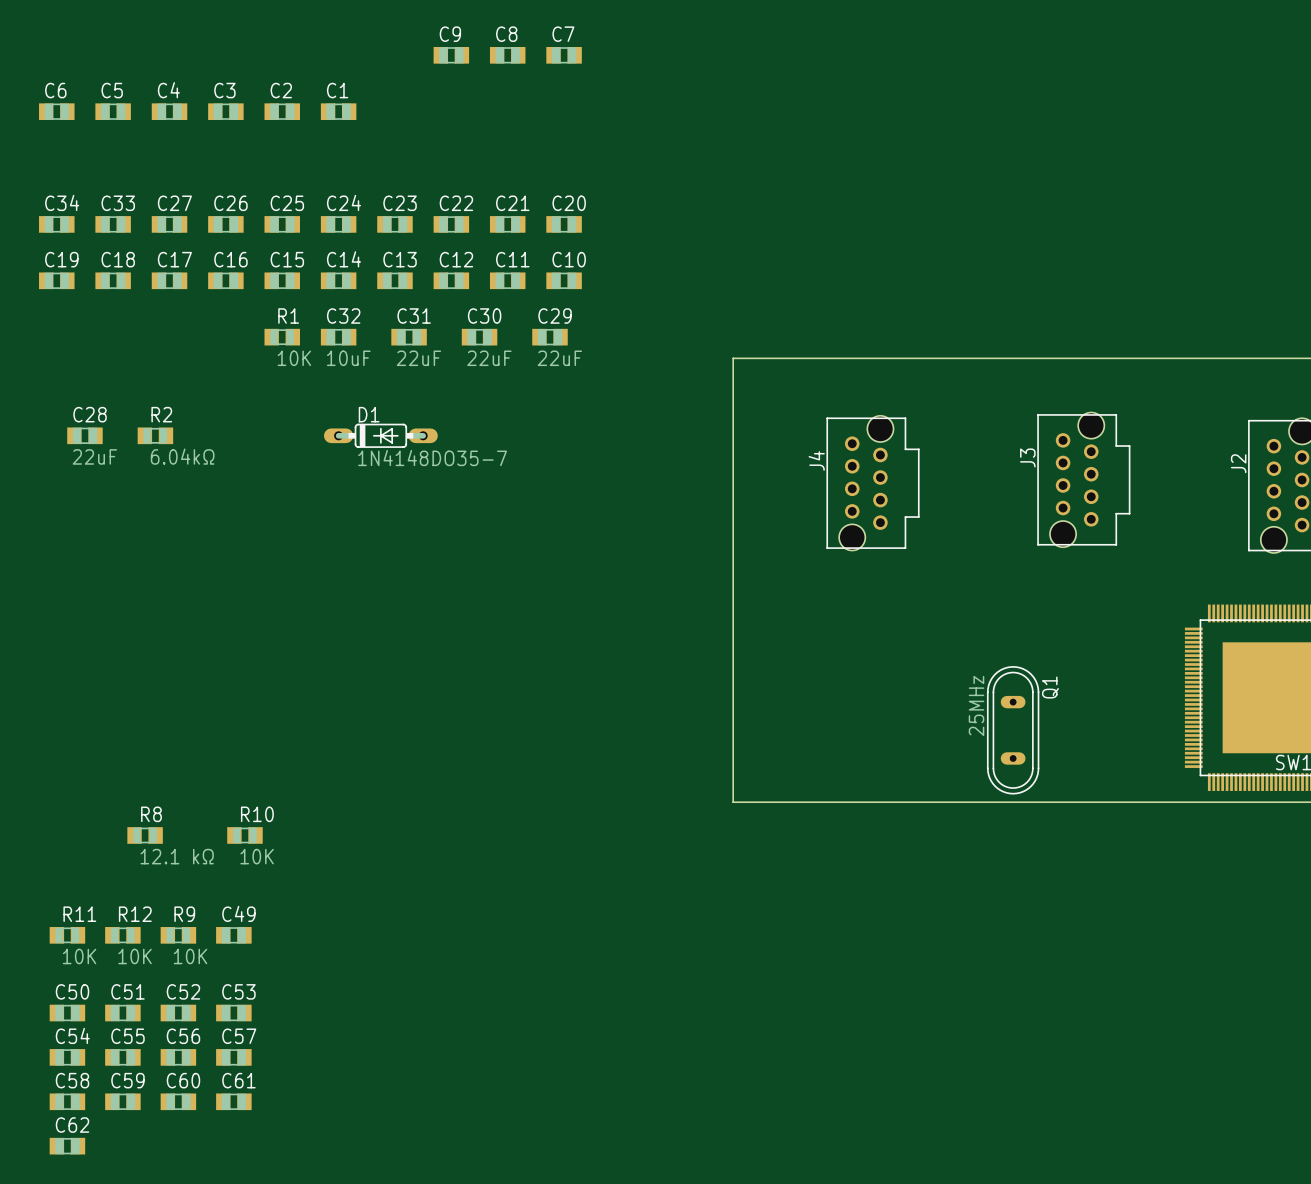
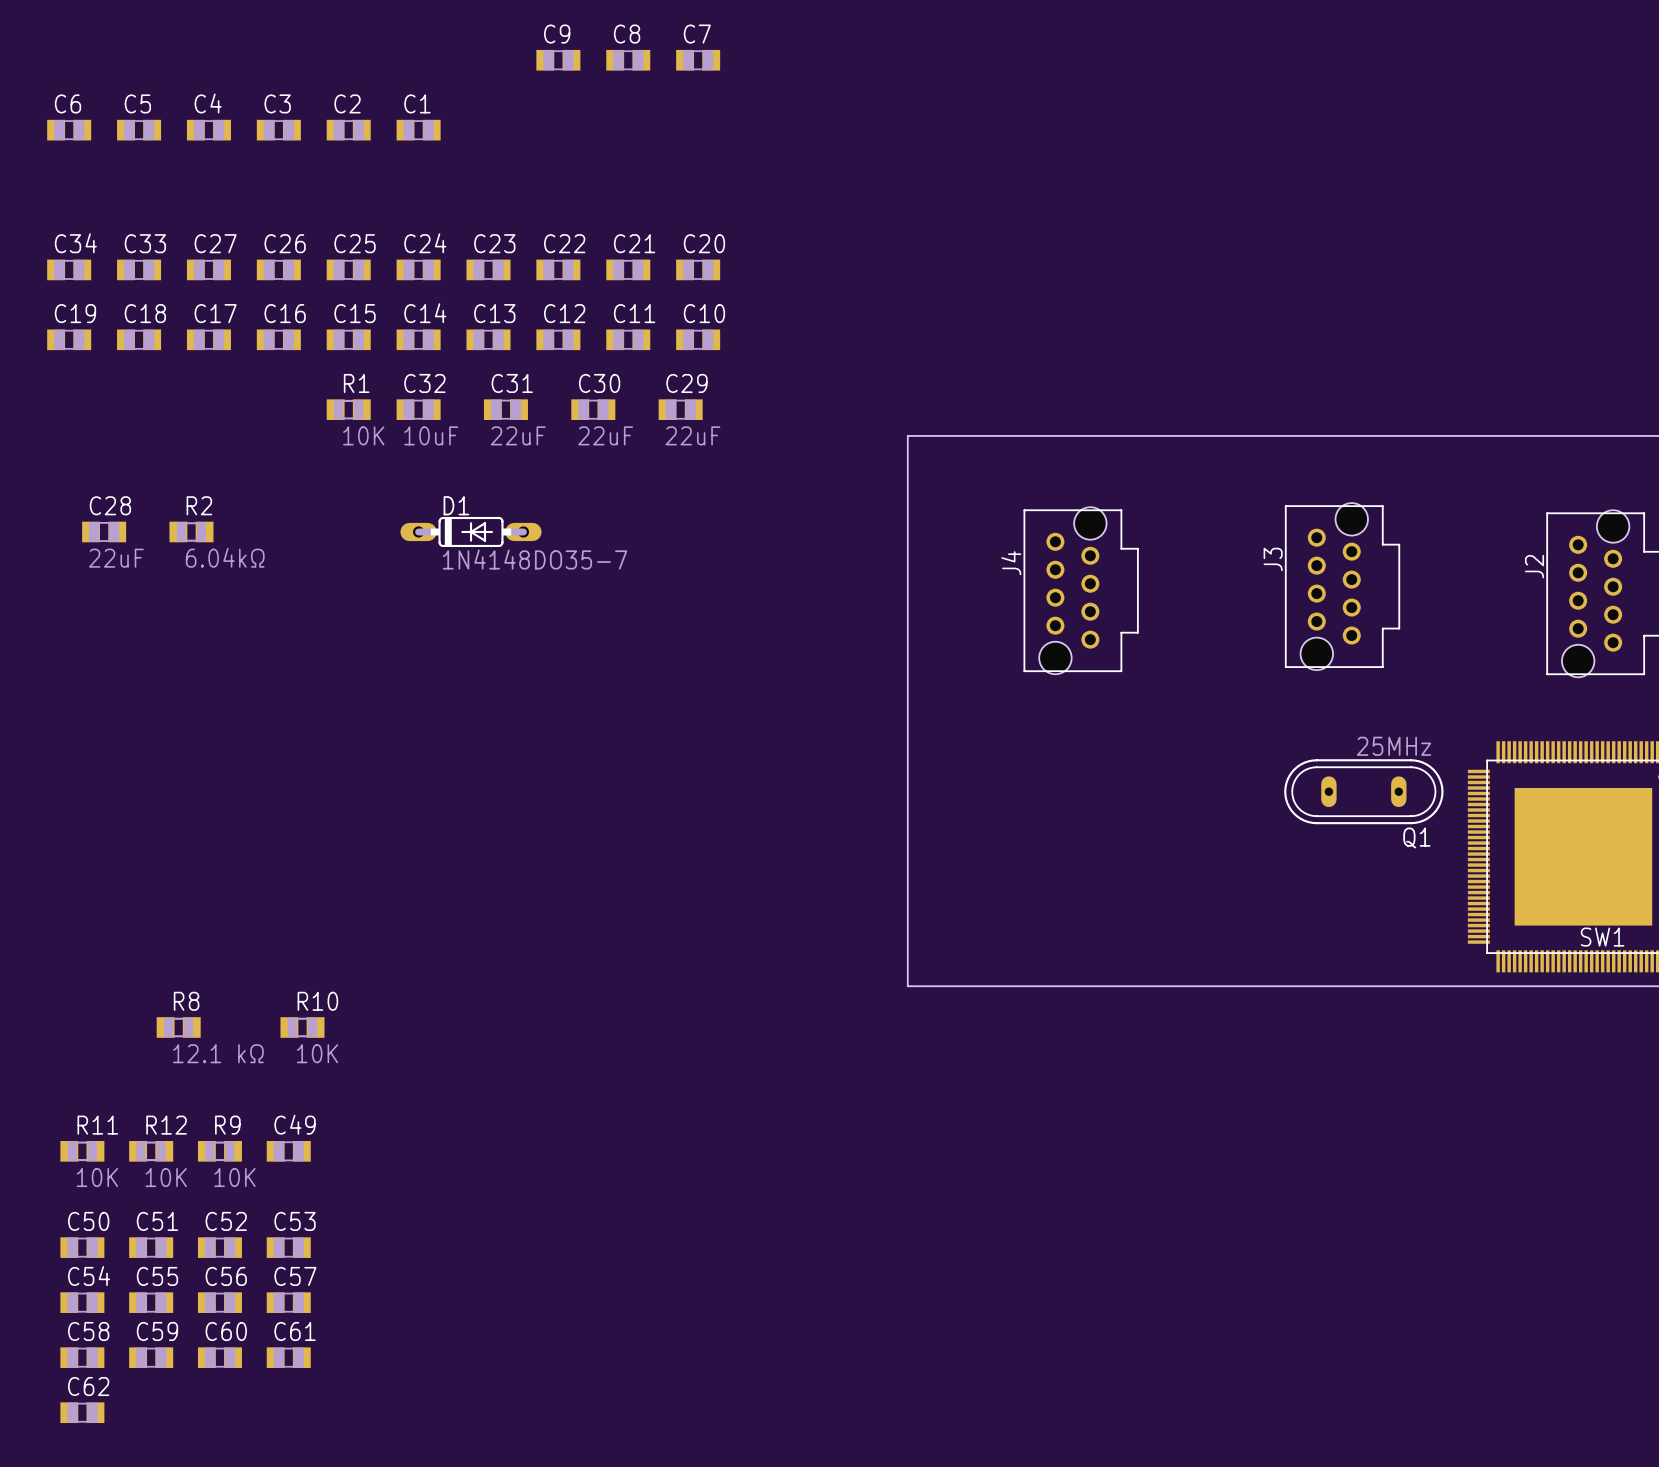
Q1 rotation: 0° (1013, 730) -> 90° clockwise (1363, 791)
Q1 position: (1013, 730) -> (1363, 791)

